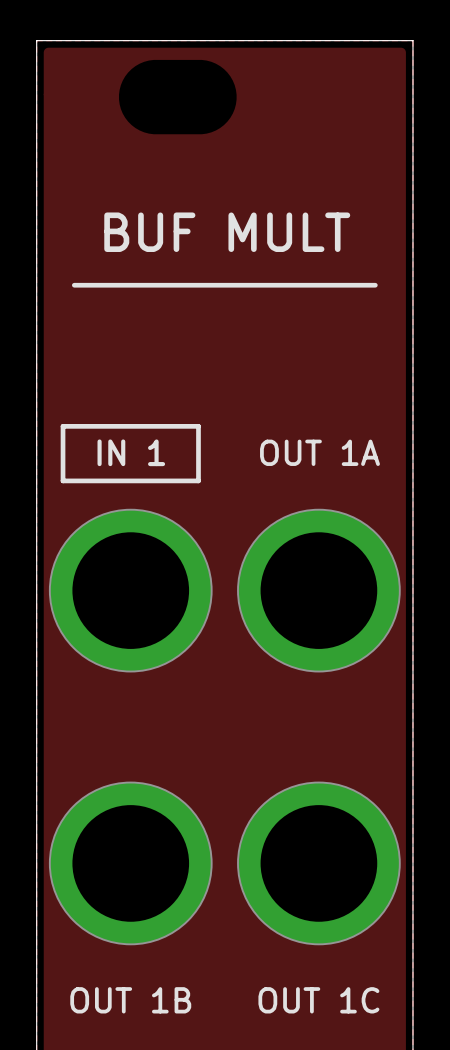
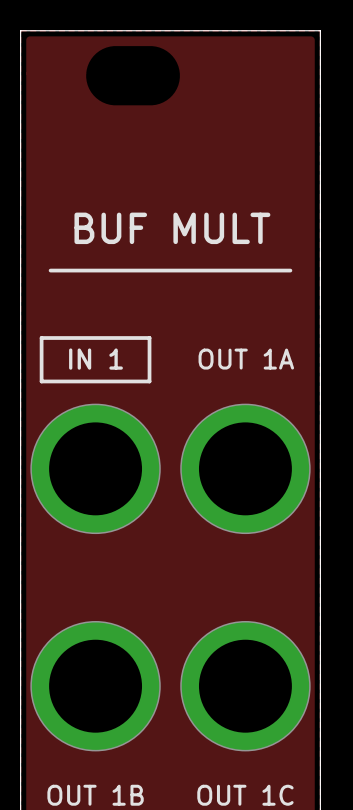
text position: BUF MULT (227, 232) -> BUF MULT (172, 228)
line: (74, 285) (375, 285) -> (50, 270) (290, 270)

